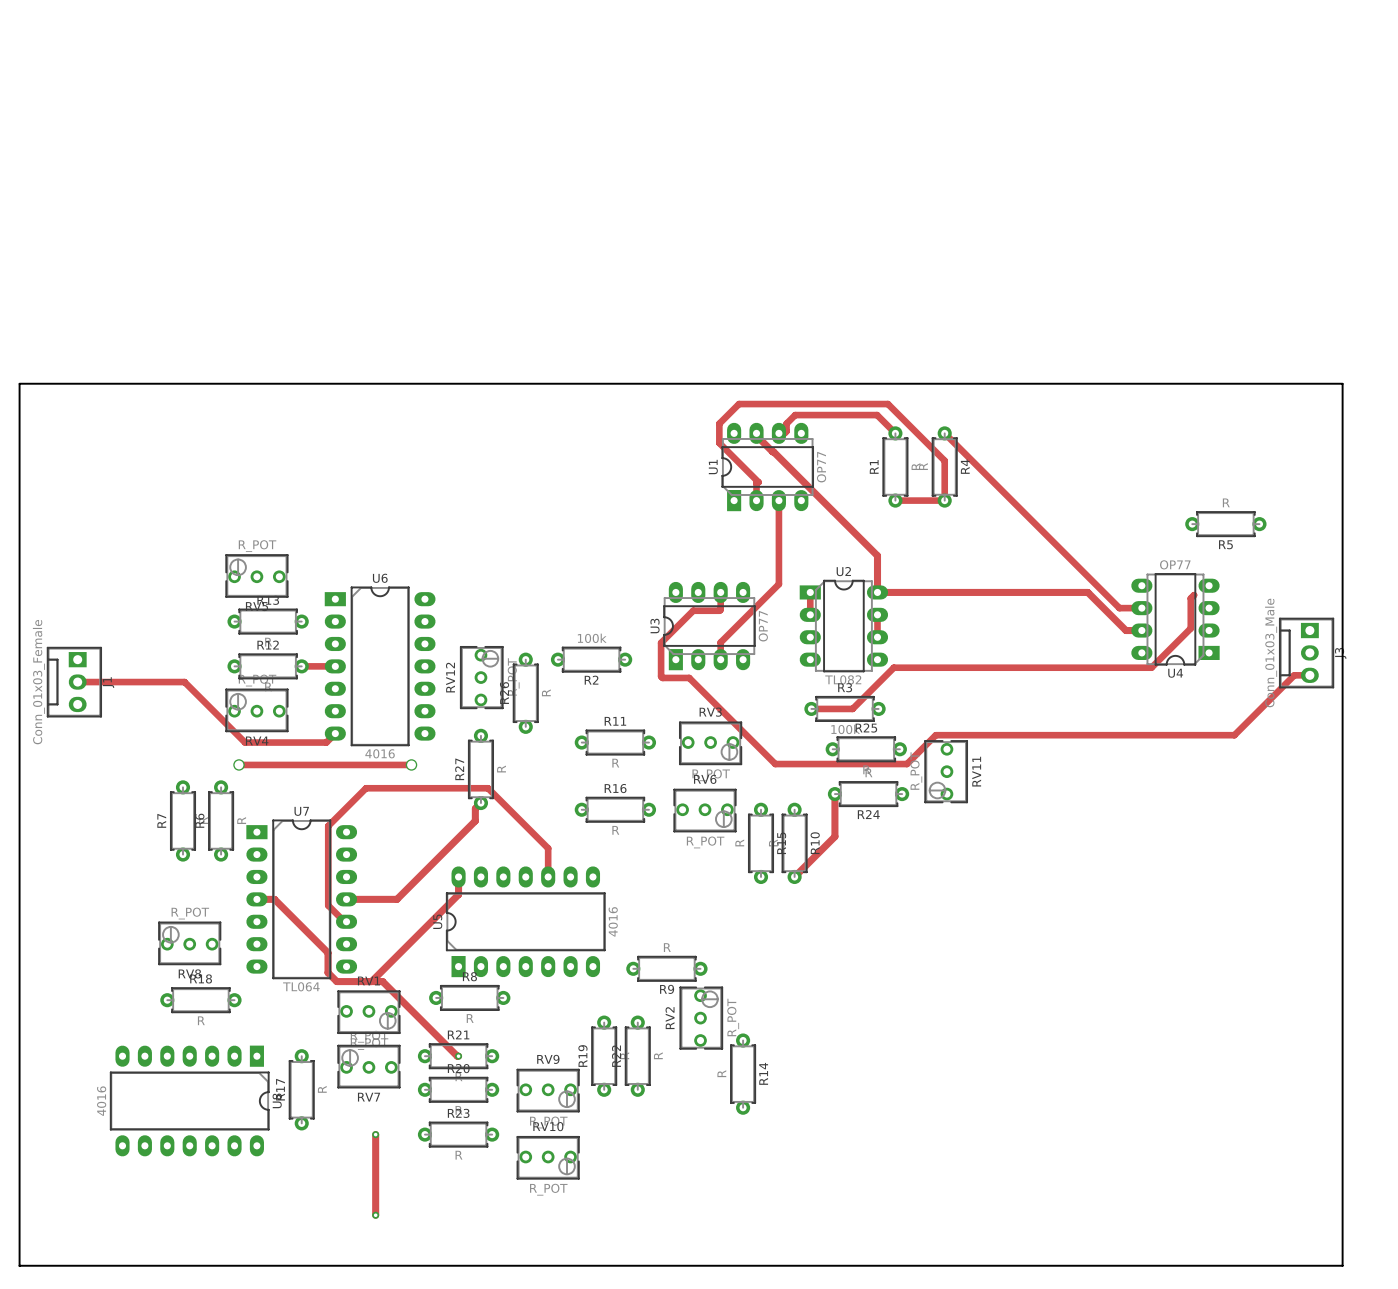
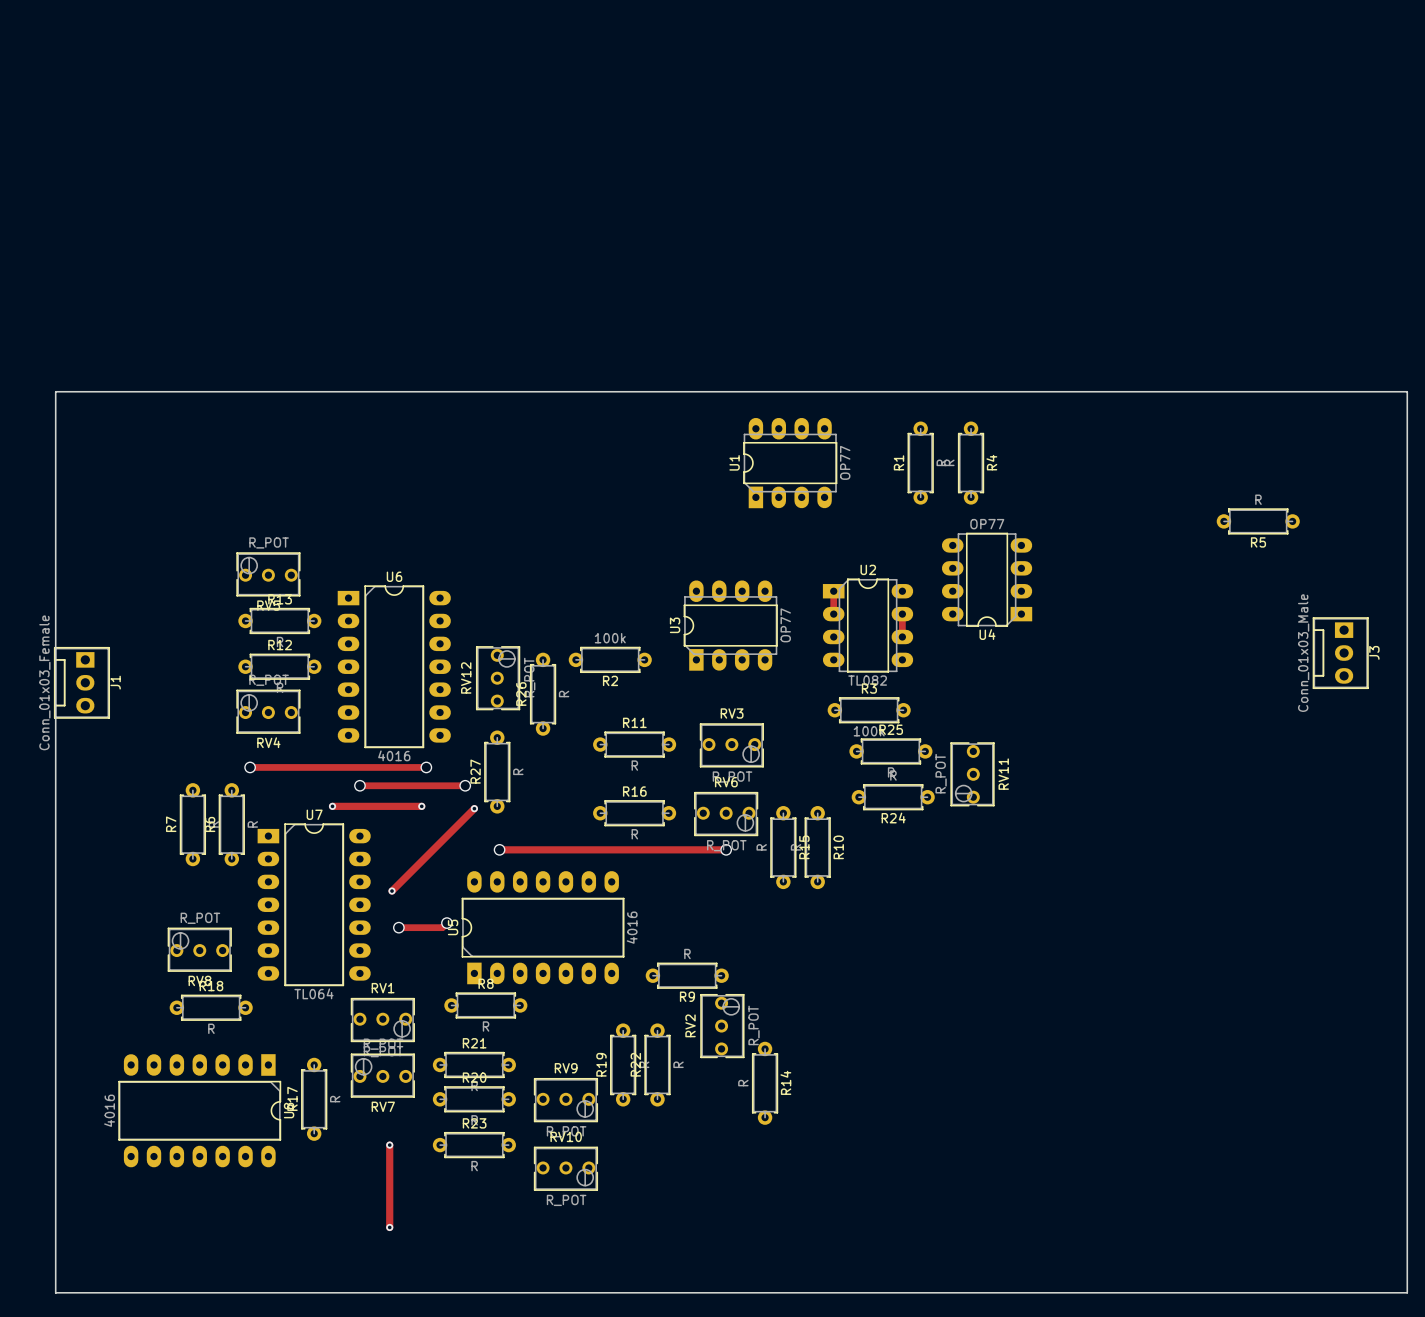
board edge: (19, 383) (1342, 383) -> (55, 391) (1407, 391)
board edge: (19, 384) (19, 1266) -> (55, 392) (55, 1293)
board edge: (1342, 384) (1342, 1265) (19, 1265) -> (1407, 392) (1407, 1292) (55, 1292)
track: (778, 433) (786, 431) (786, 423) (795, 415) (877, 415) (895, 433) -> none
track: (945, 434) (1119, 608) (1141, 608) -> none
track: (756, 435) (877, 555) (877, 592) (1087, 592) (1125, 630) (1141, 630) -> none
track: (756, 500) (756, 483) (758, 482) (719, 443) (719, 423) (739, 404) (887, 404) (944, 460) (944, 500) (895, 500) -> none
track: (778, 500) (778, 584) (720, 642) (720, 659) -> none
track: (720, 592) (719, 610) (693, 610) (661, 642) (661, 676) (689, 677) (775, 764) (906, 764) (935, 735) (1234, 735) (1294, 675) (1309, 675) -> none
track: (1194, 595) (1190, 598) (1190, 628) (1151, 667) (893, 667) (852, 708) (811, 708) -> none
U4 position: (1175, 619) -> (987, 579)
track: (301, 666) (335, 666) -> none
track: (77, 682) (184, 682) (245, 742) (326, 742) (335, 733) -> none
track: none -> (359, 785) (465, 785)
via: none -> (359, 785)
via: none -> (465, 785)
track: (834, 794) (834, 836) (794, 876) -> none
track: none -> (332, 806) (421, 806)
via: none -> (332, 806)
via: none -> (421, 806)
track: (480, 803) (475, 808) (475, 820) (396, 899) (346, 899) -> none
track: none -> (474, 808) (392, 891)
via: none -> (474, 808)
track: none -> (499, 849) (726, 849)
via: none -> (499, 849)
via: none -> (726, 849)
track: (458, 876) (458, 894) (371, 981) -> none
track: (548, 876) (548, 848) (488, 788) (366, 788) (328, 826) (328, 905) (346, 921) -> none
via: none -> (392, 891)
track: (256, 899) (274, 899) (328, 952) (328, 972) (336, 981) (382, 981) (458, 1056) -> none
track: none -> (446, 923) (442, 927) (398, 927)
via: none -> (446, 923)
via: none -> (398, 927)
via: (458, 1056) -> none

